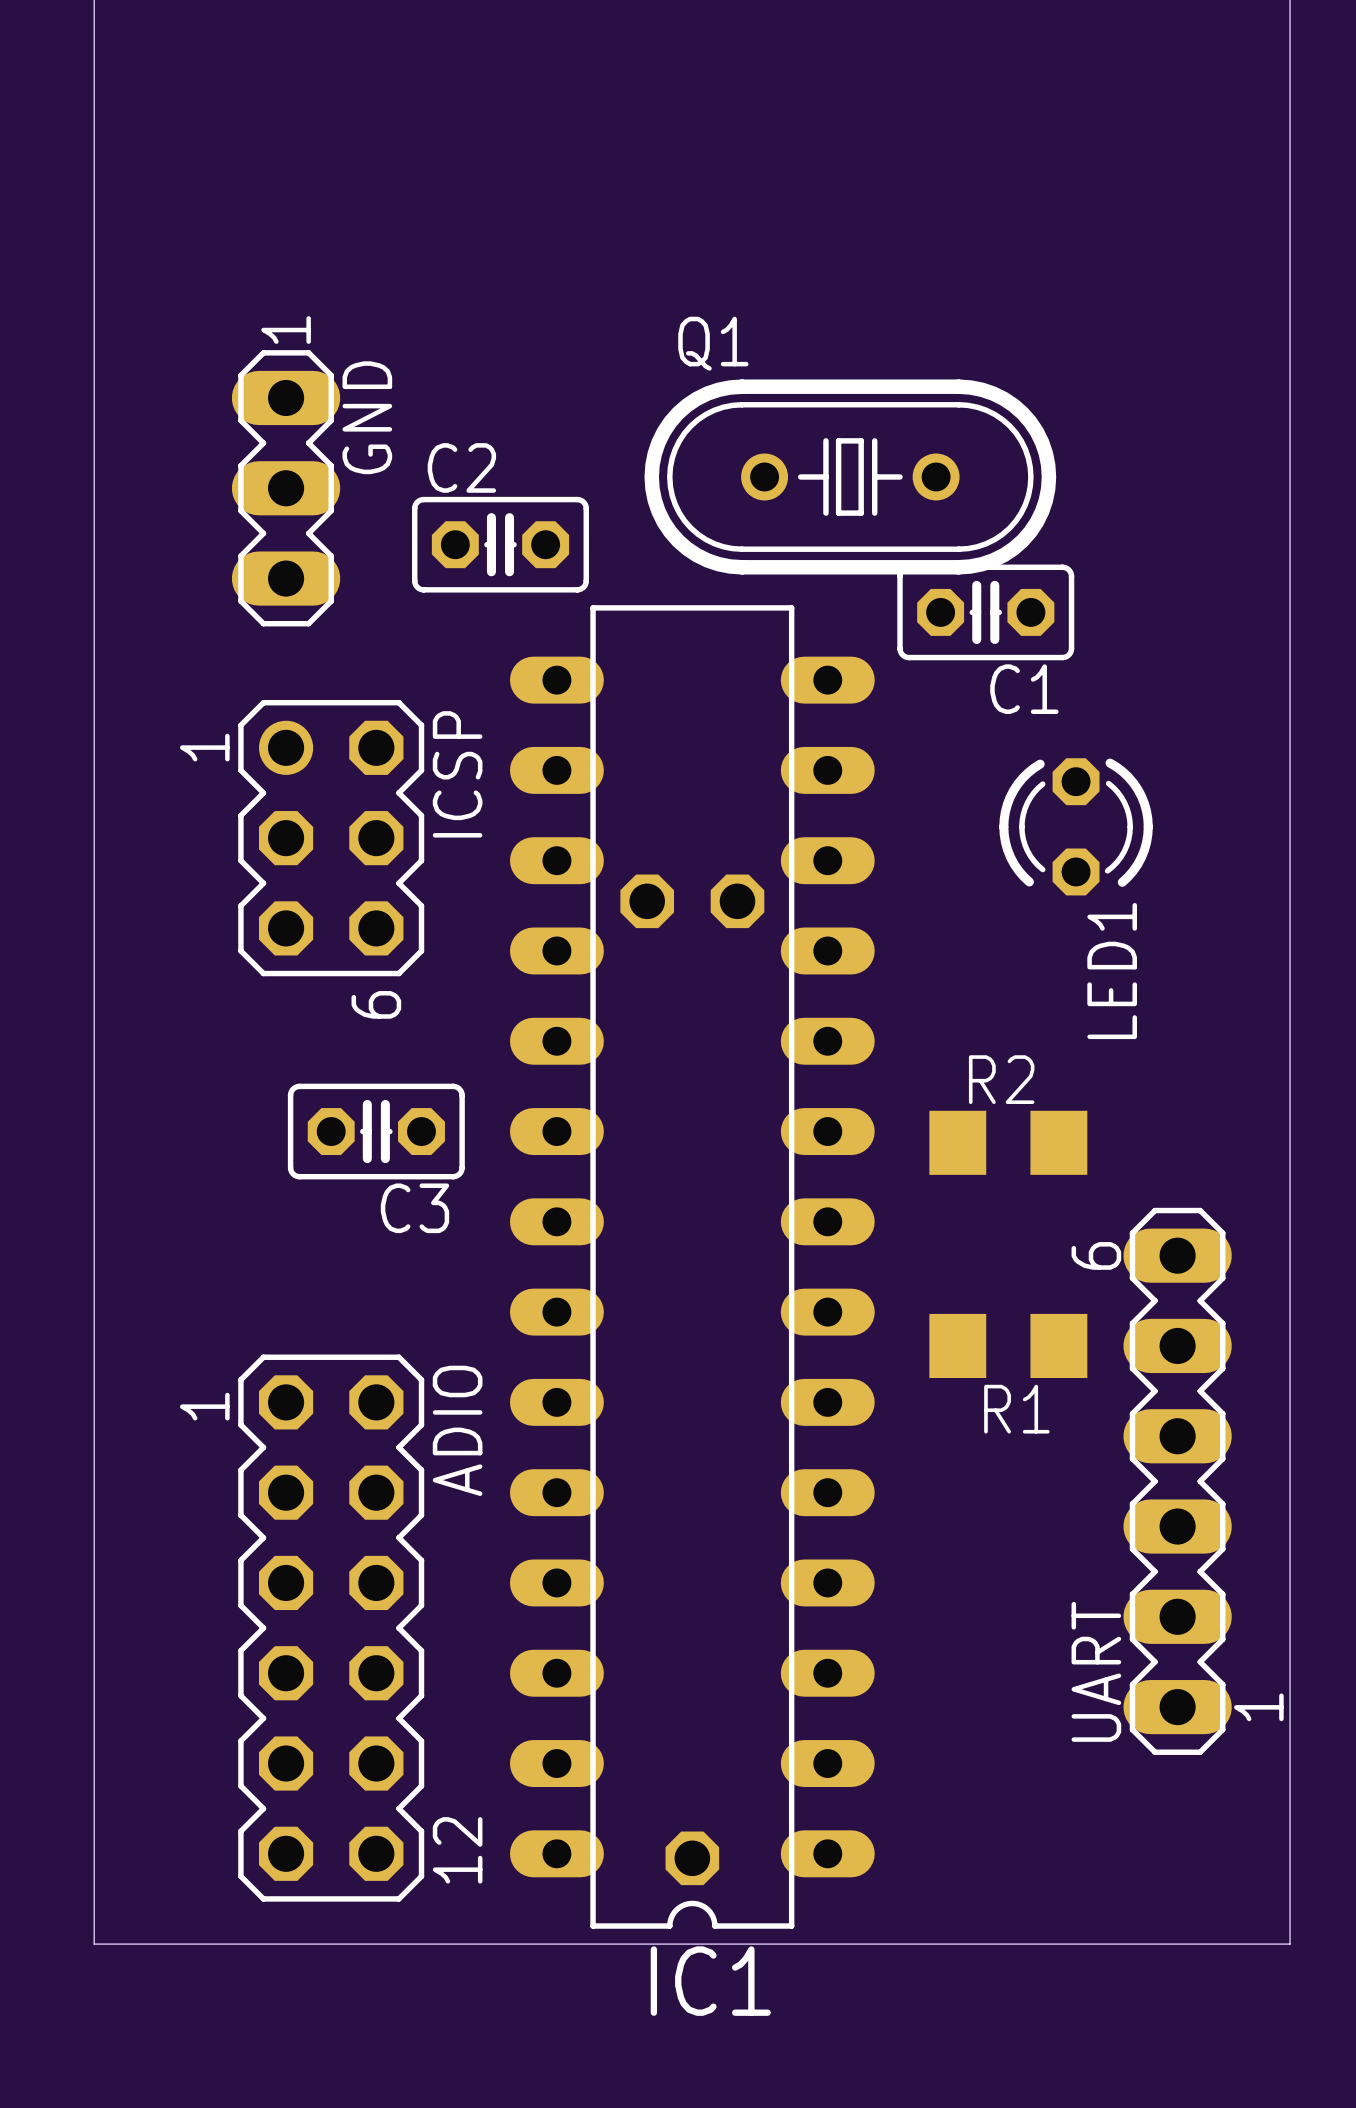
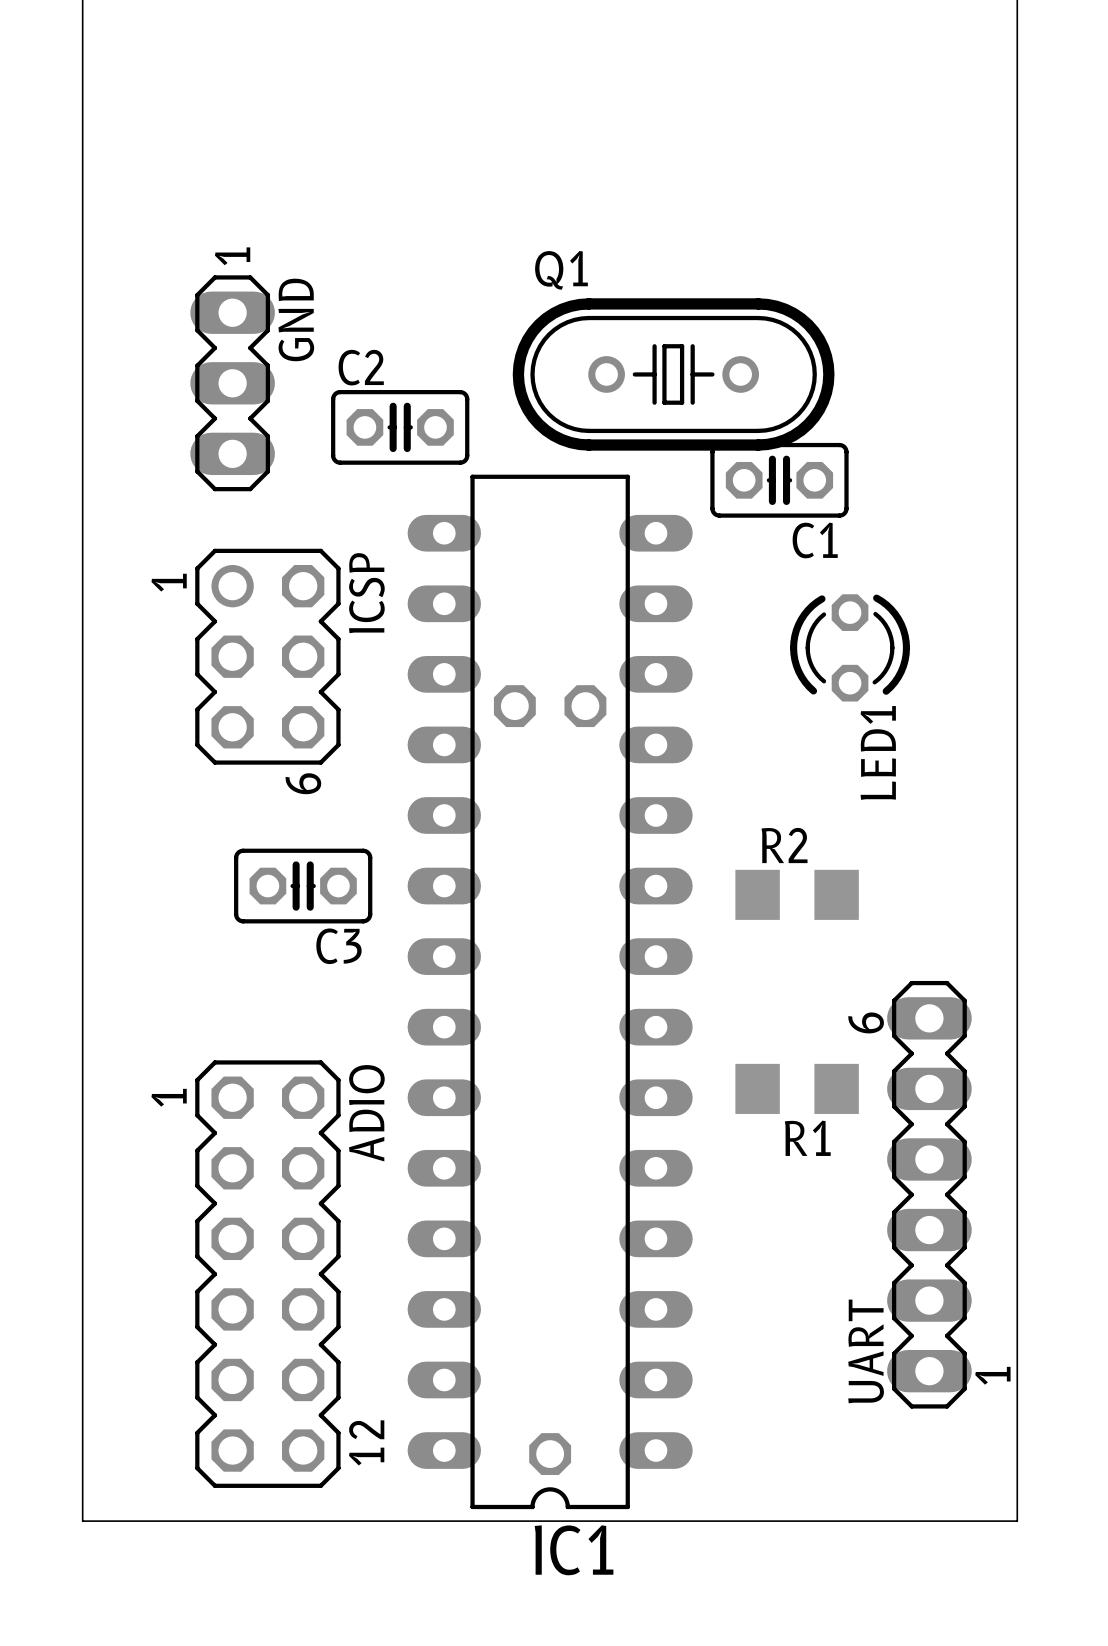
R1 position: (1008, 1345) -> (797, 1088)
UART position: (1177, 1481) -> (929, 1194)

